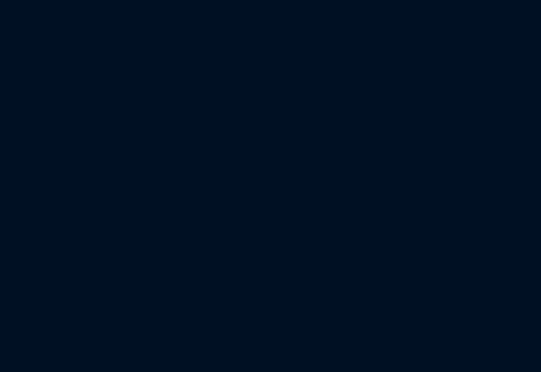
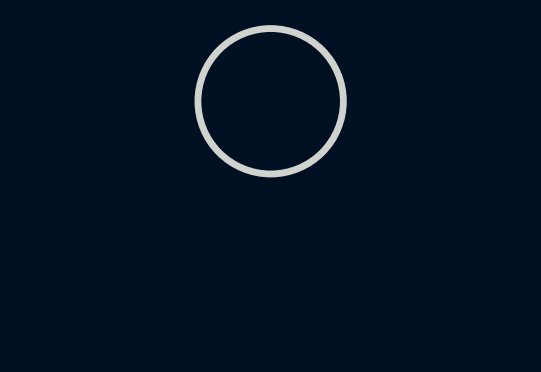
round board edge: none -> [194, 25, 347, 178]

